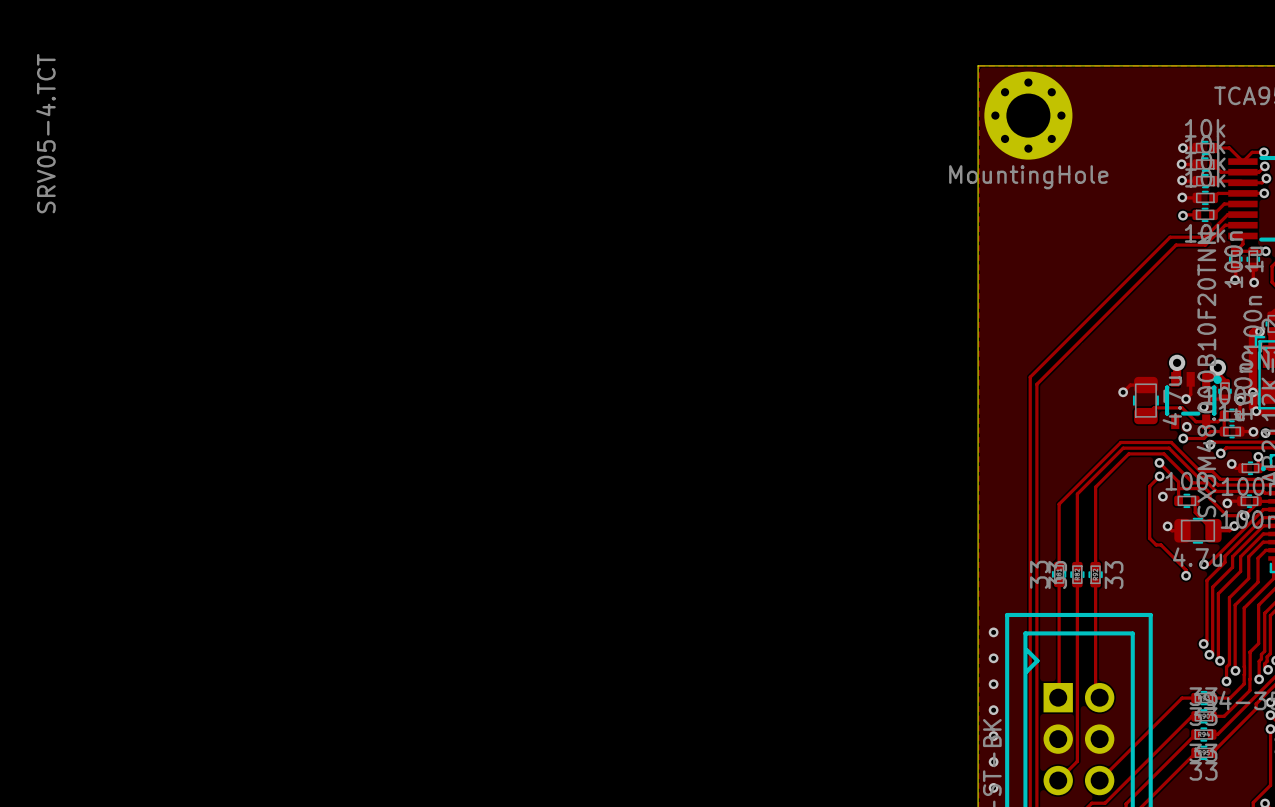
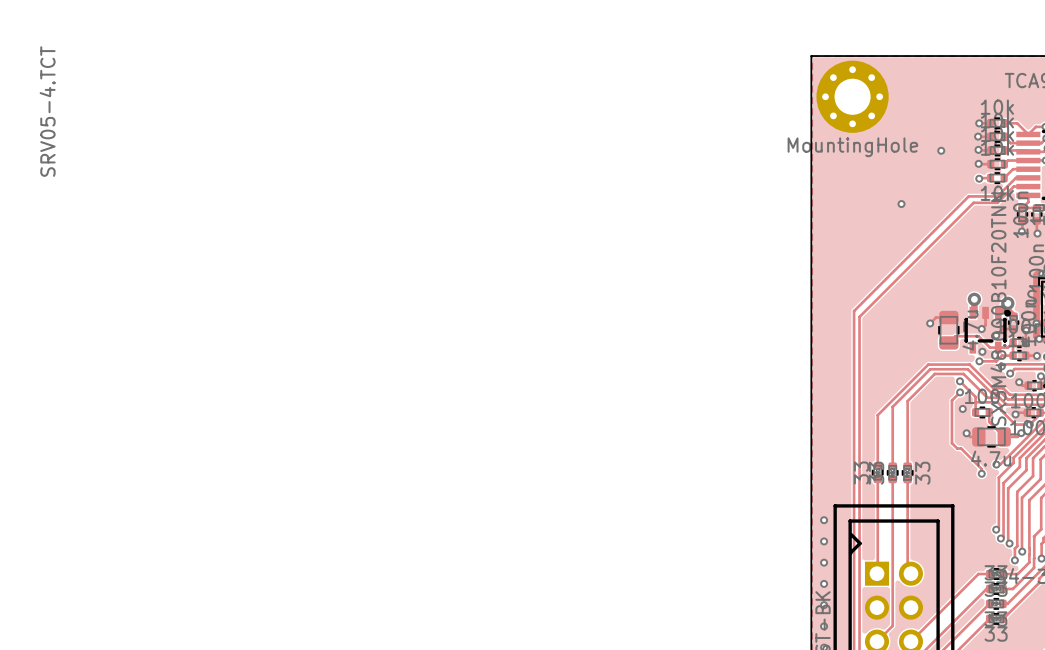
via: none -> (941, 150)
via: none -> (901, 204)

